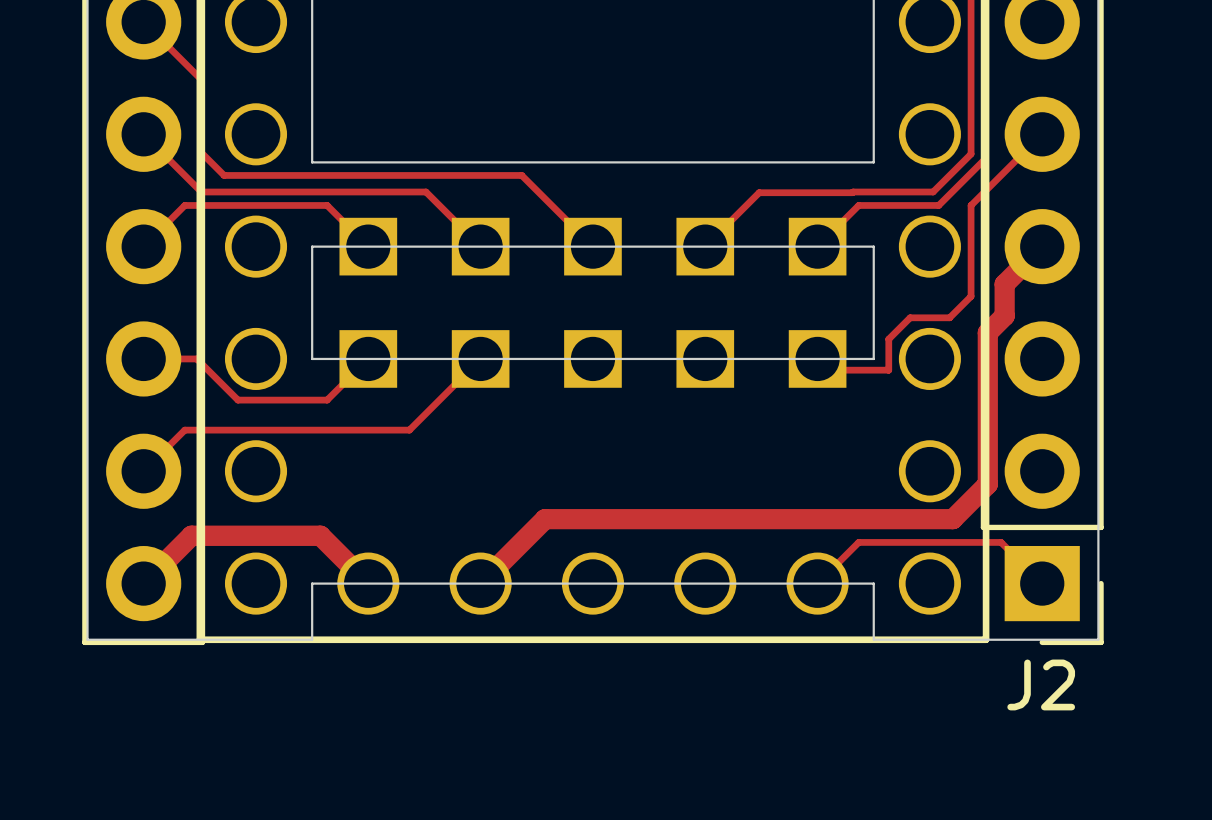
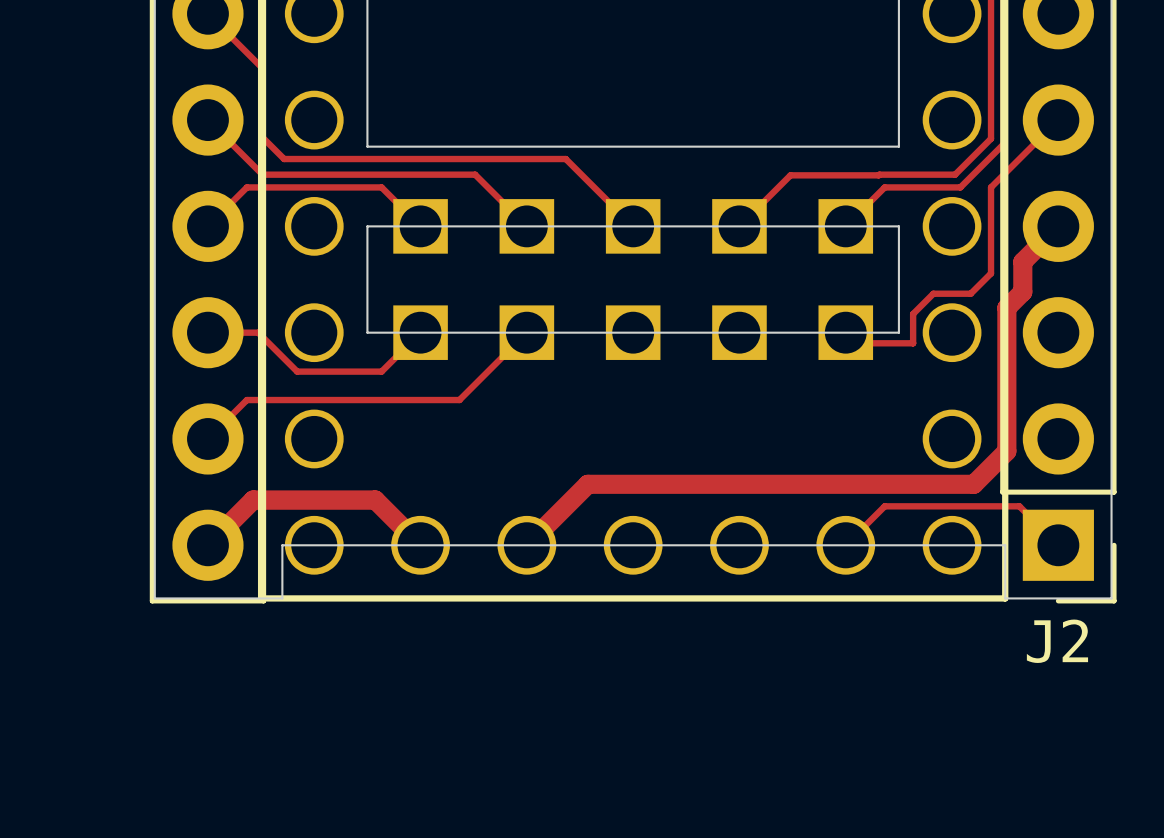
board edge: (312, 583) (312, 639) (222, 639) -> (367, 545) (282, 545) (282, 598)
board edge: (873, 583) (873, 639) (986, 639) -> (898, 545) (1005, 545) (1005, 598)

